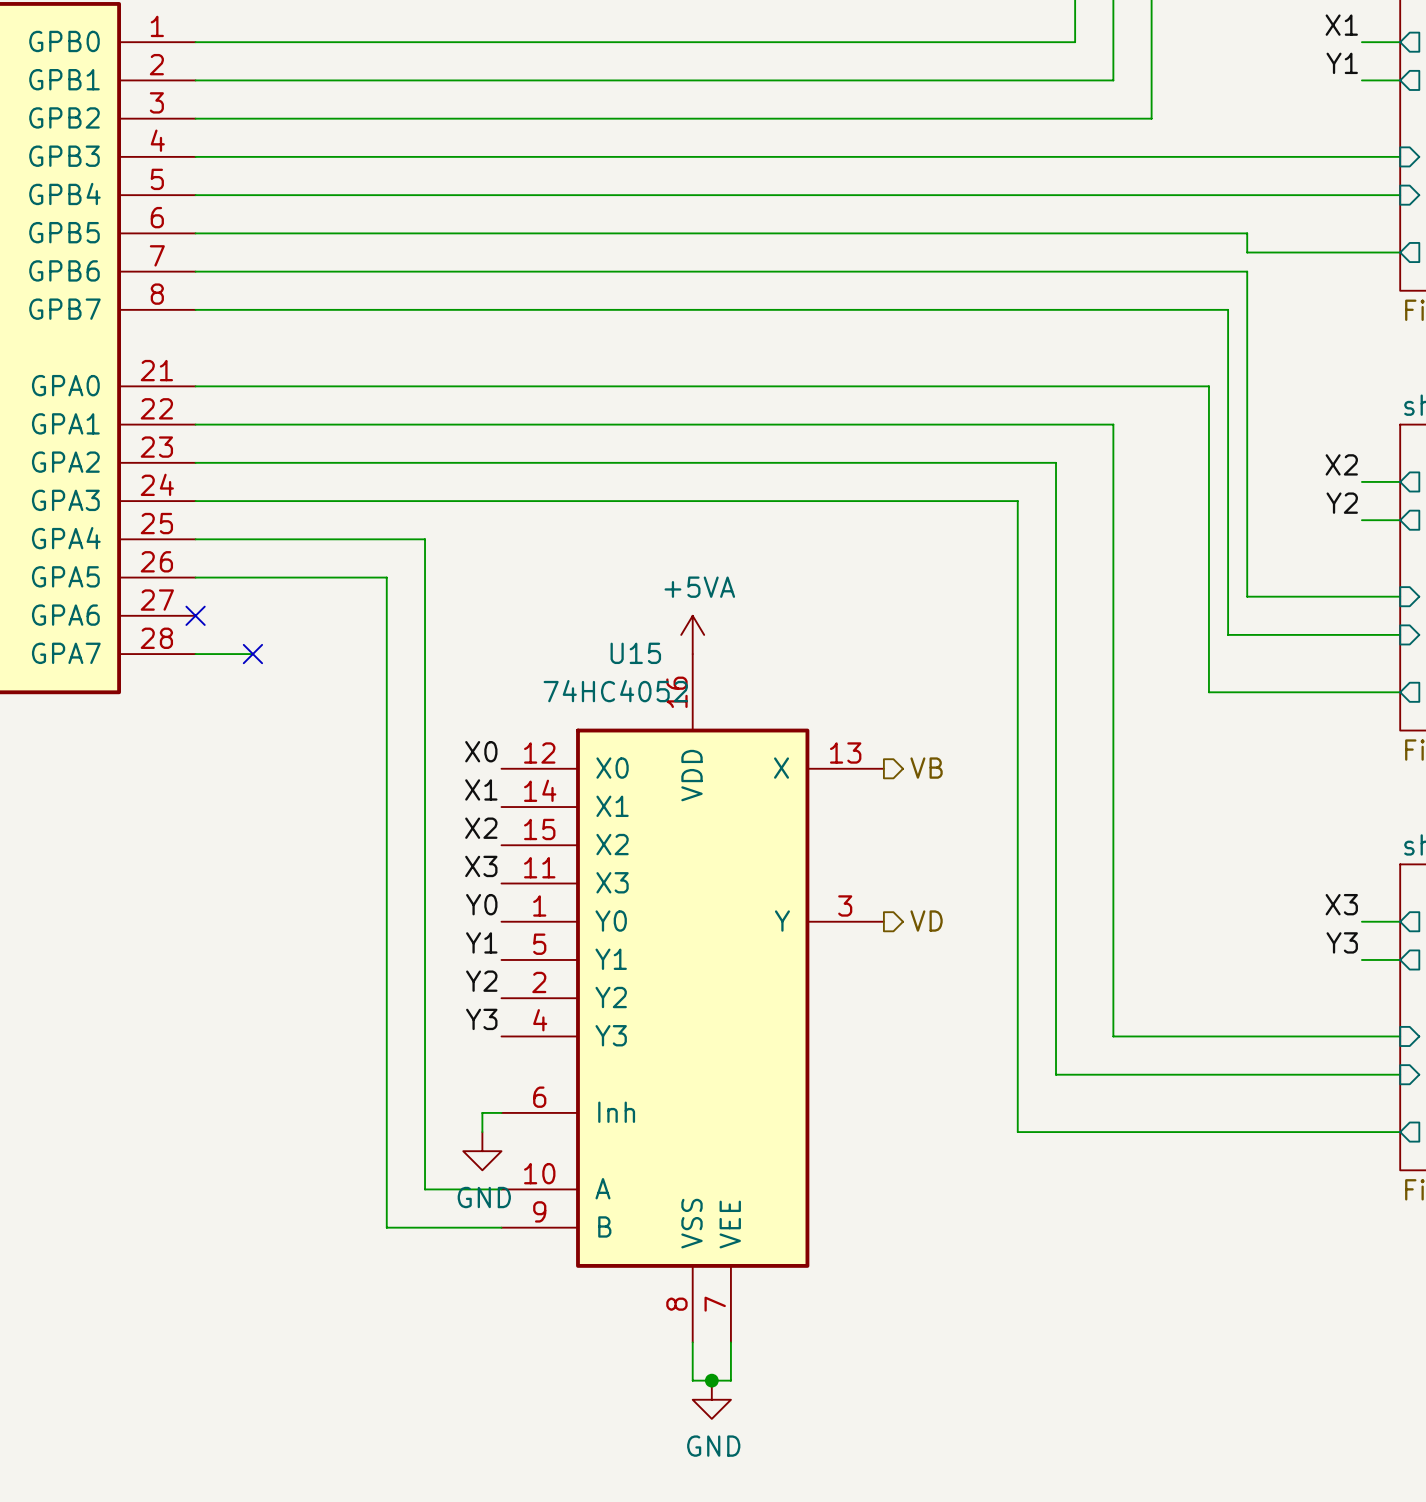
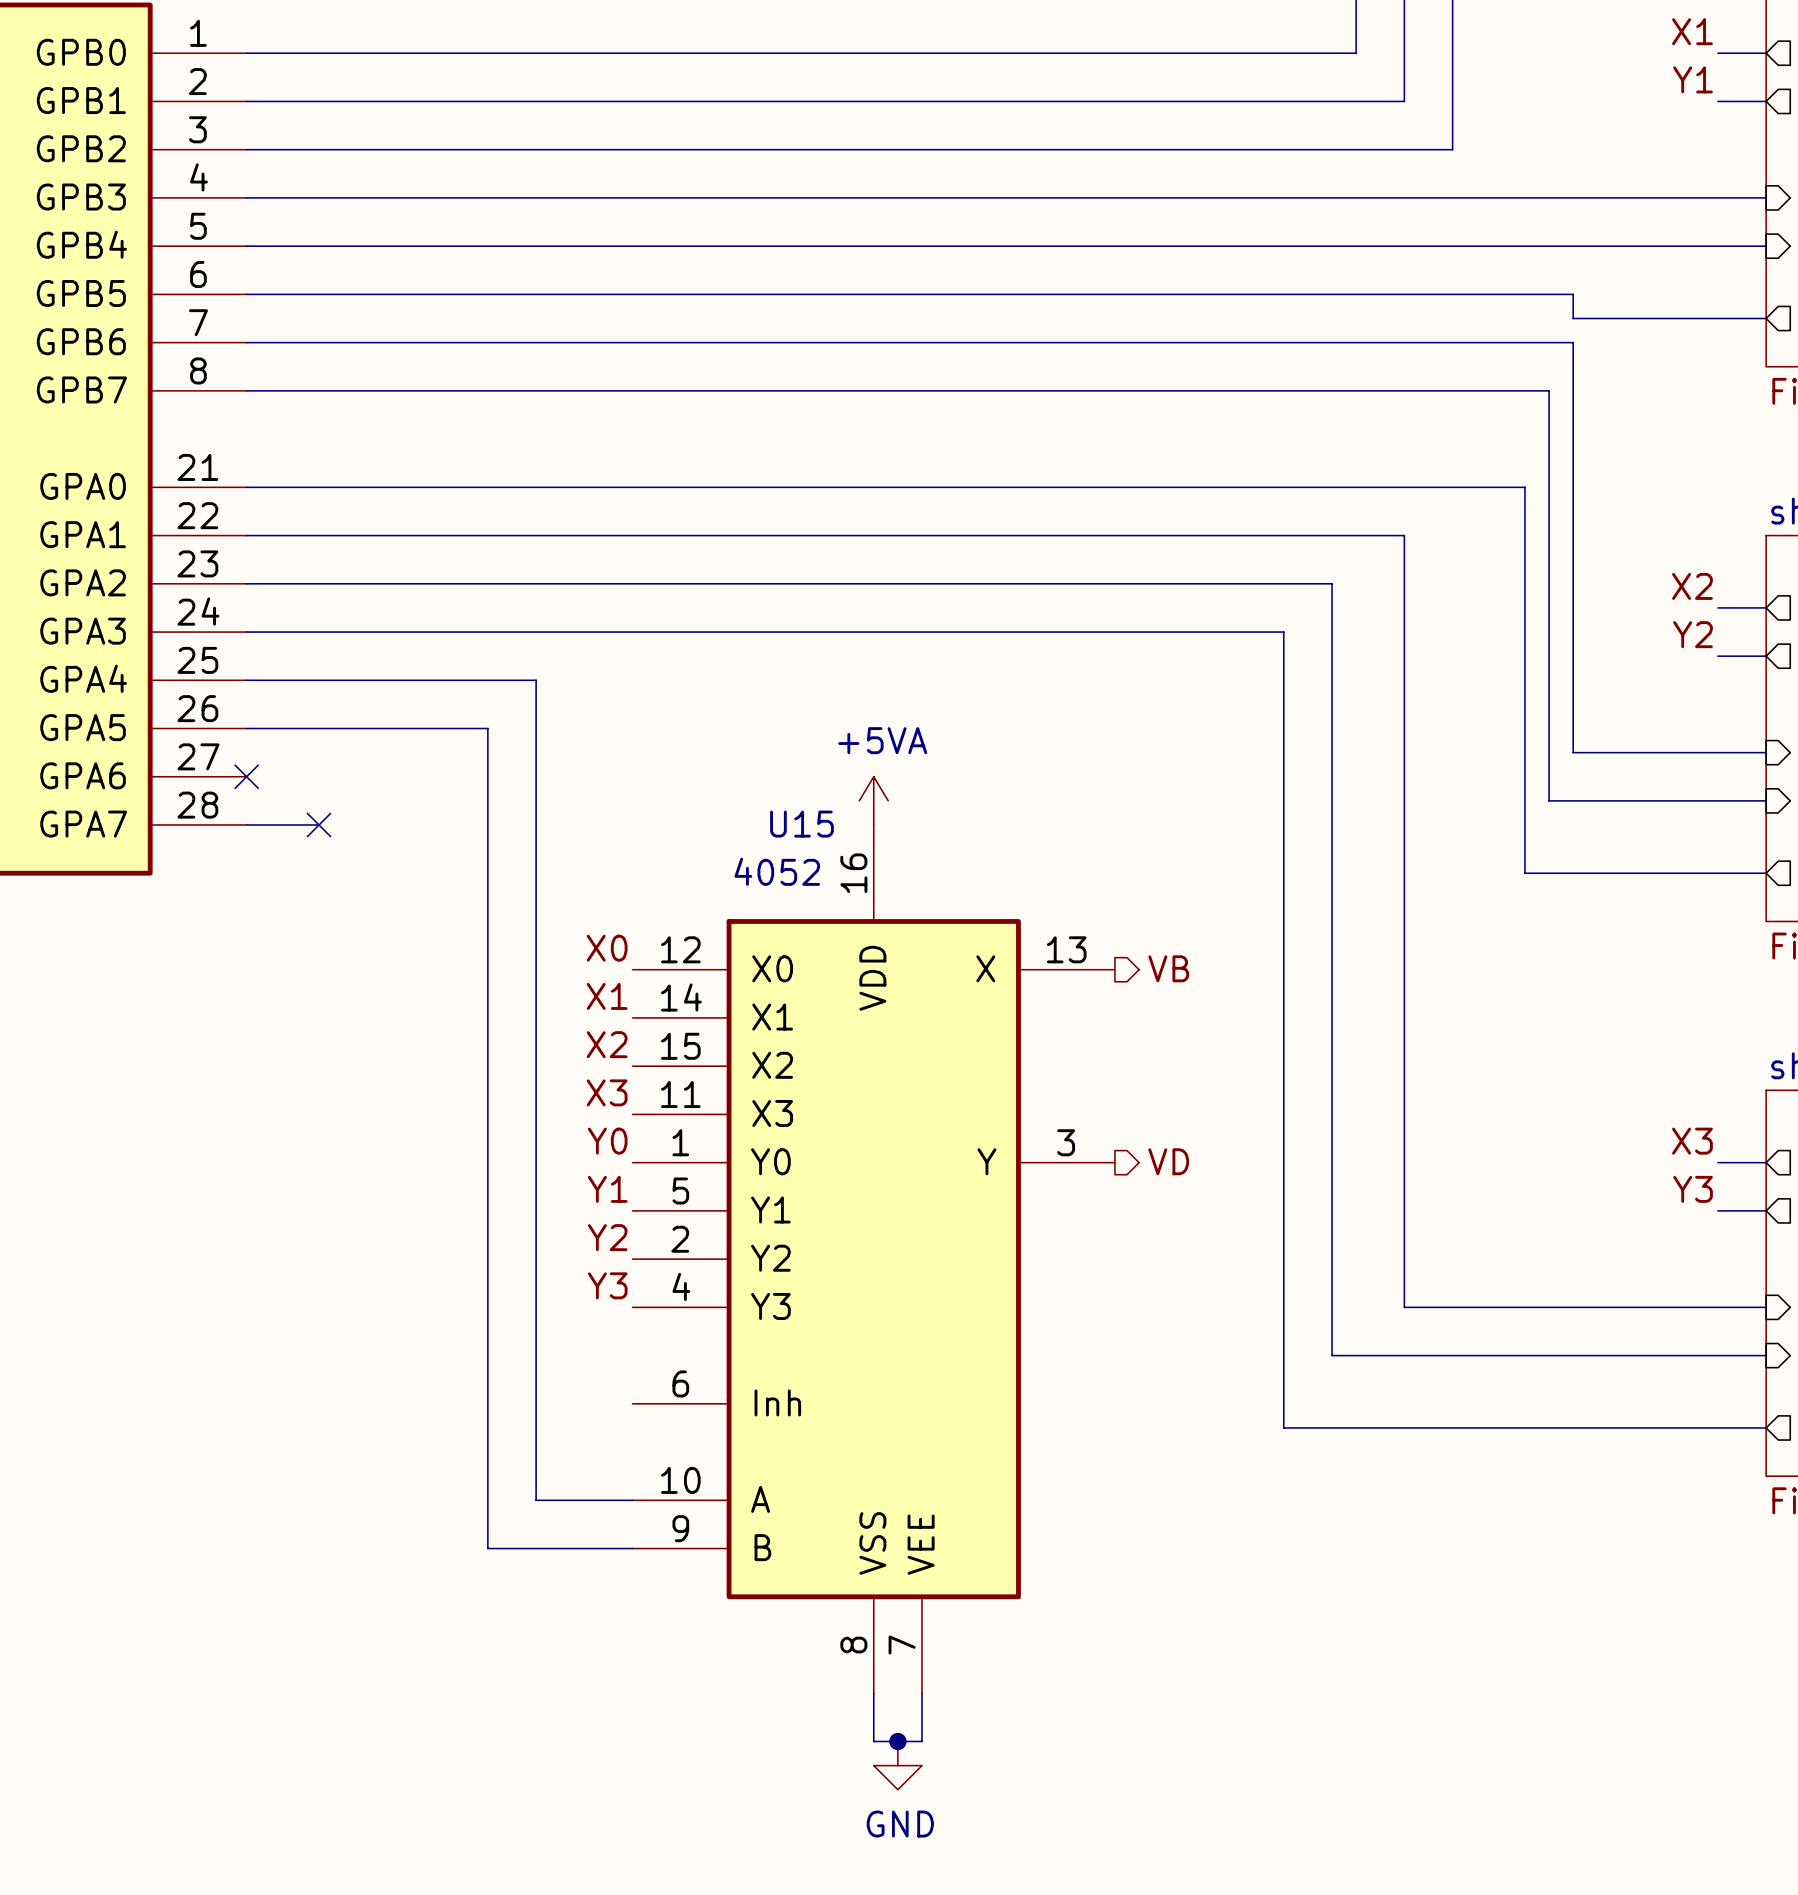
U15 value: 74HC4052 (615, 691) -> 4052 (777, 871)
wire: (501, 1112) (482, 1112) (482, 1132) -> none
power symbol: GND (482, 1151) -> none

